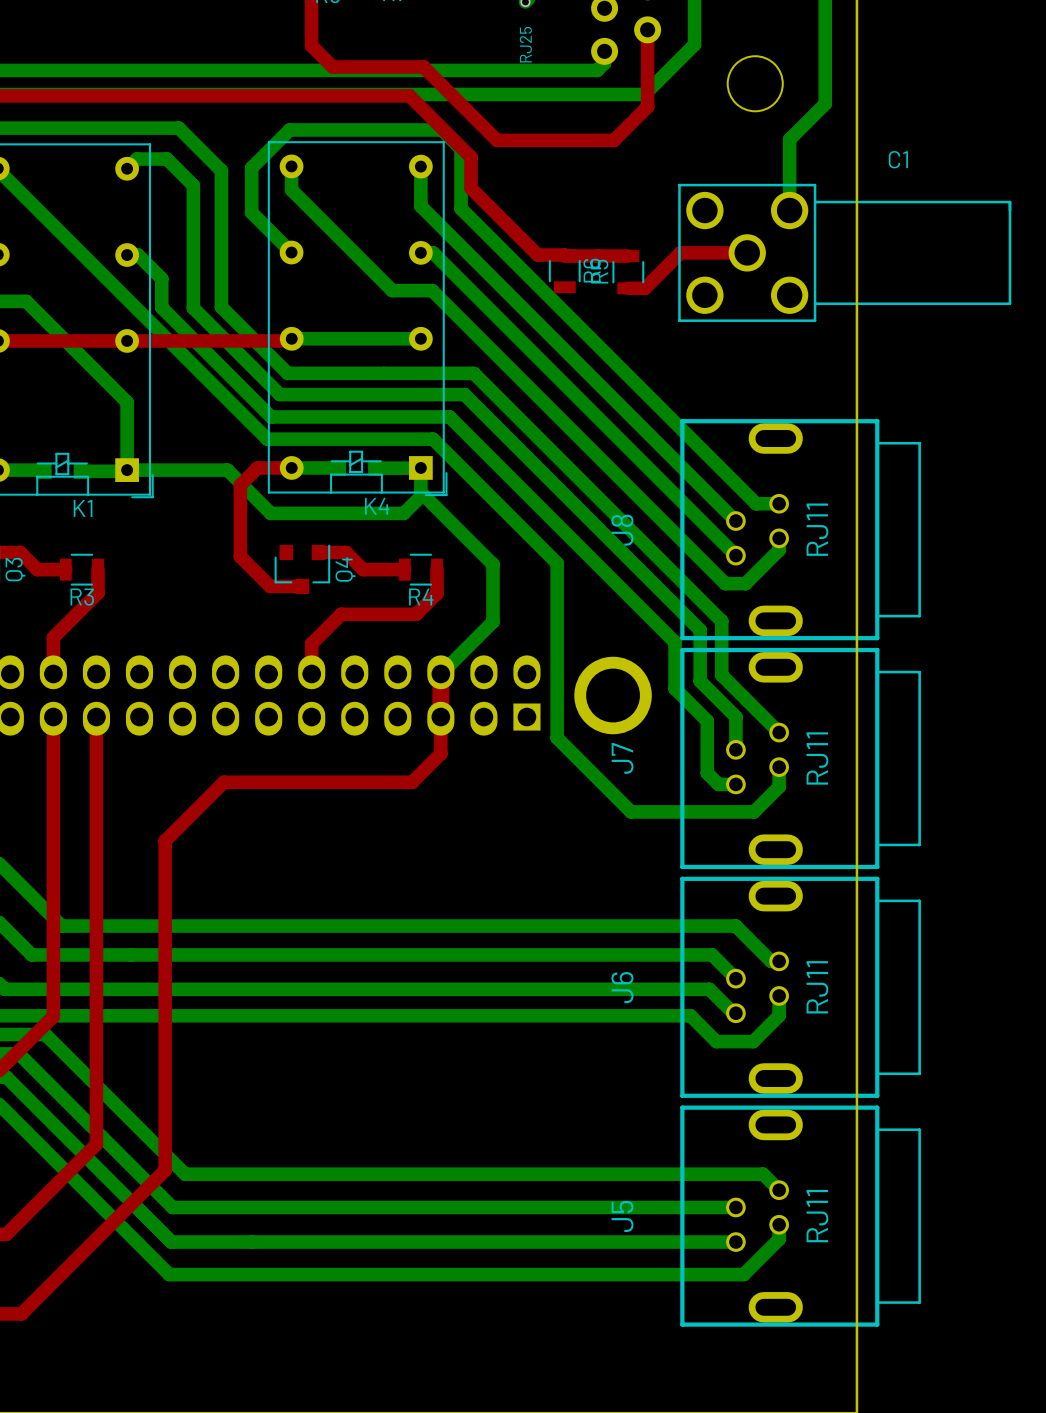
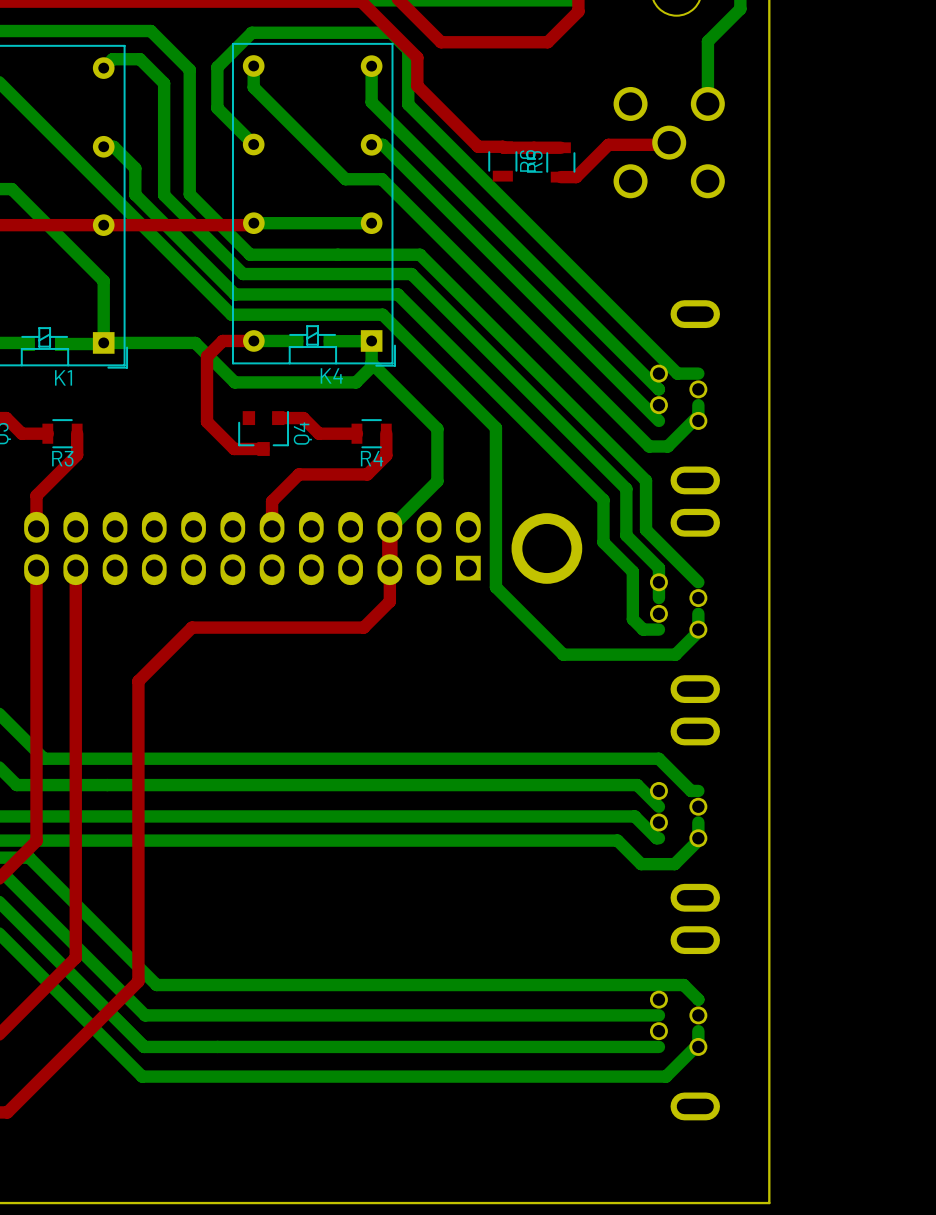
C1 side: top (844, 252) -> bottom (669, 142)
part: none -> (684, 397)
J8: RJ11 (800, 529) -> none
part: none -> (684, 605)
J7: RJ11 (800, 758) -> none
part: none -> (684, 814)
J6: RJ11 (800, 987) -> none
J5 side: top (800, 1216) -> bottom (684, 1023)

